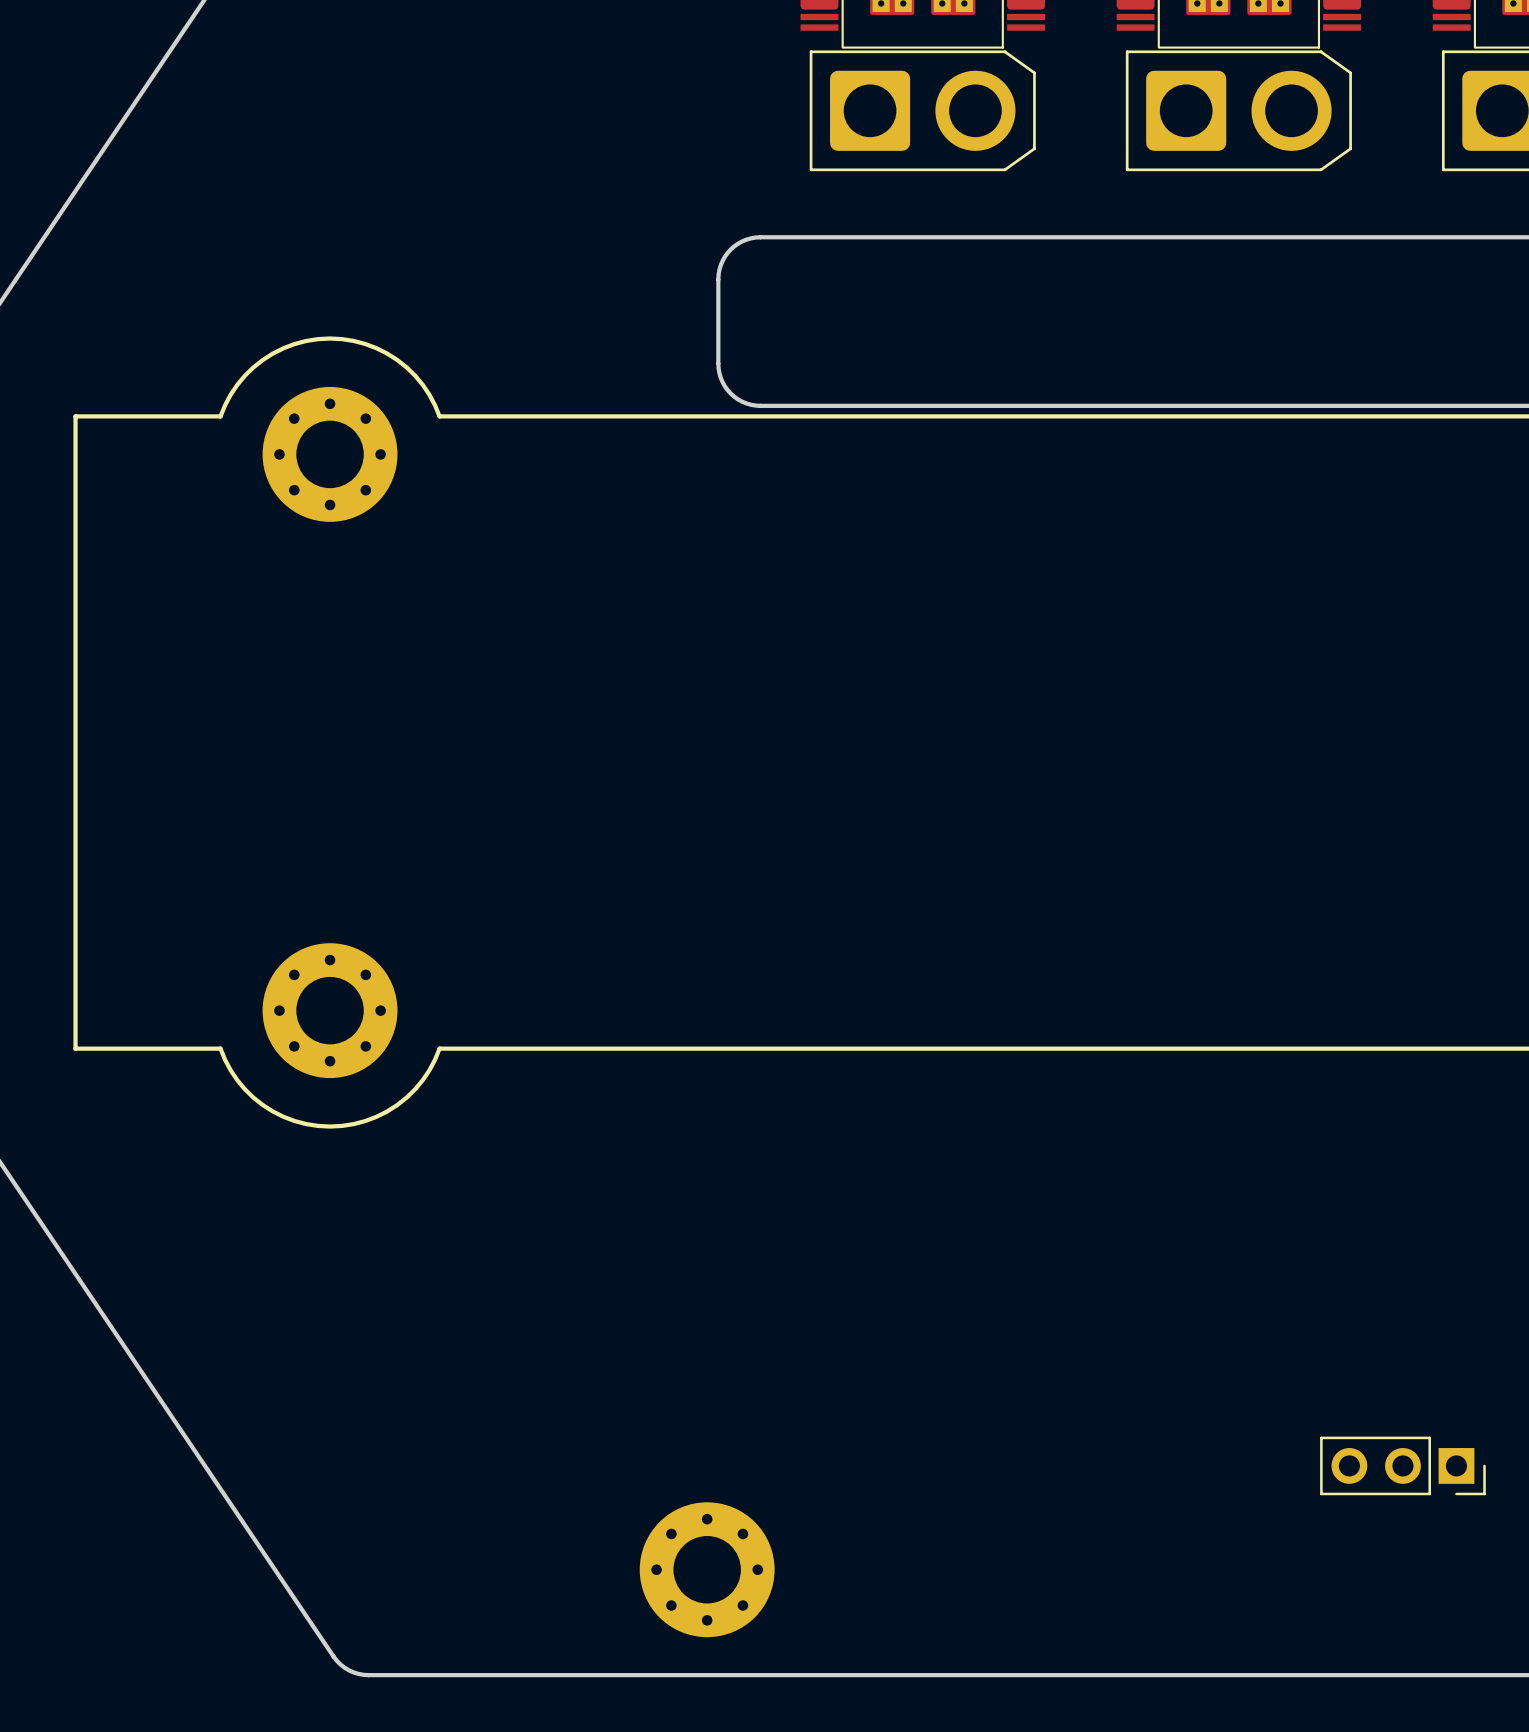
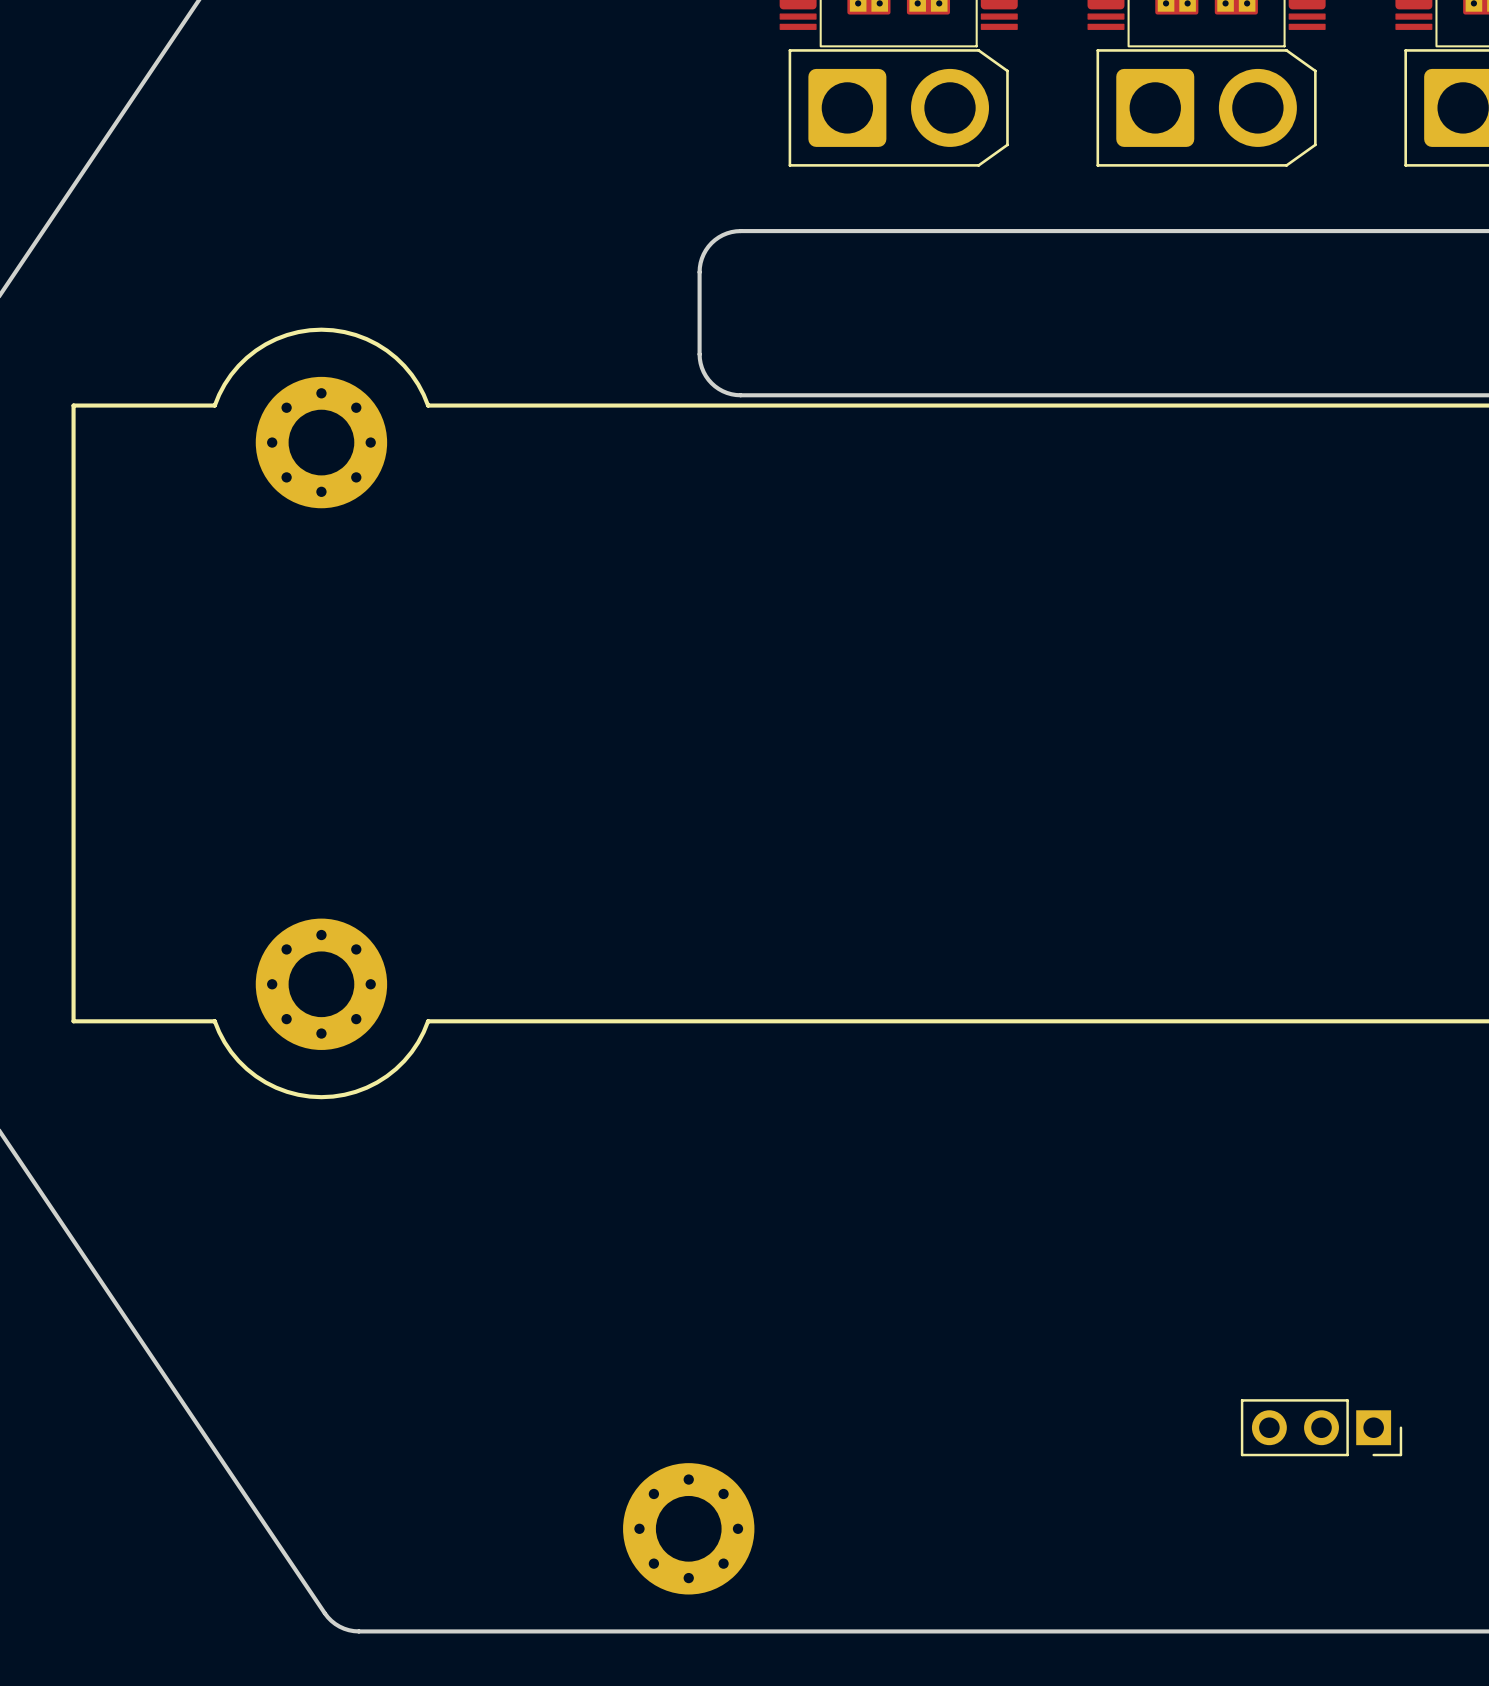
part position: (1402, 1465) -> (1321, 1427)

